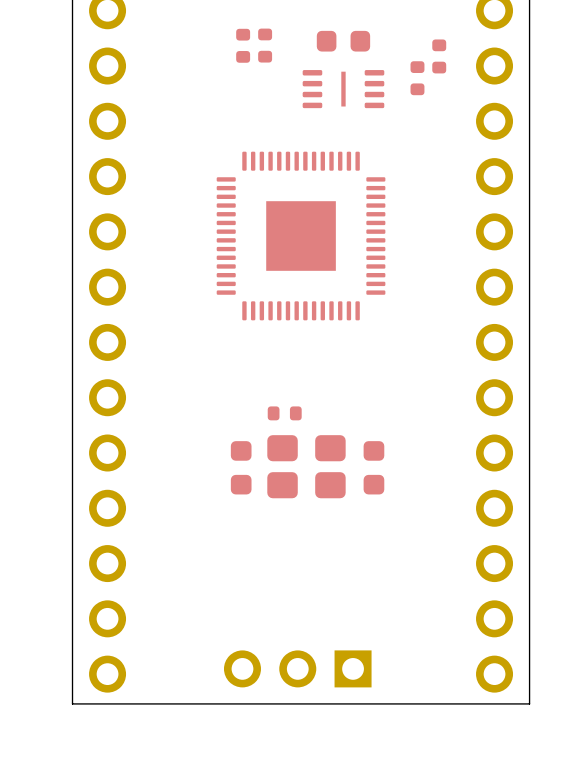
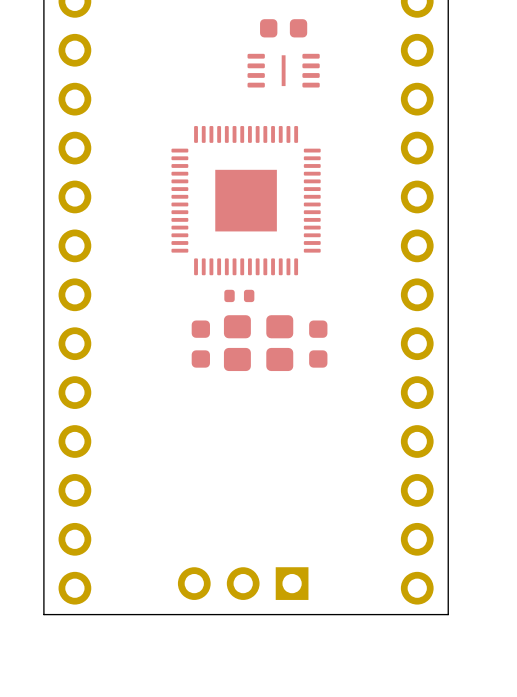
part: (243, 45) -> none
part: (265, 45) -> none
part: (439, 56) -> none
part: (417, 78) -> none
part position: (284, 413) -> (239, 295)
part position: (306, 466) -> (258, 343)
part position: (241, 467) -> (200, 344)
part position: (373, 467) -> (318, 344)

